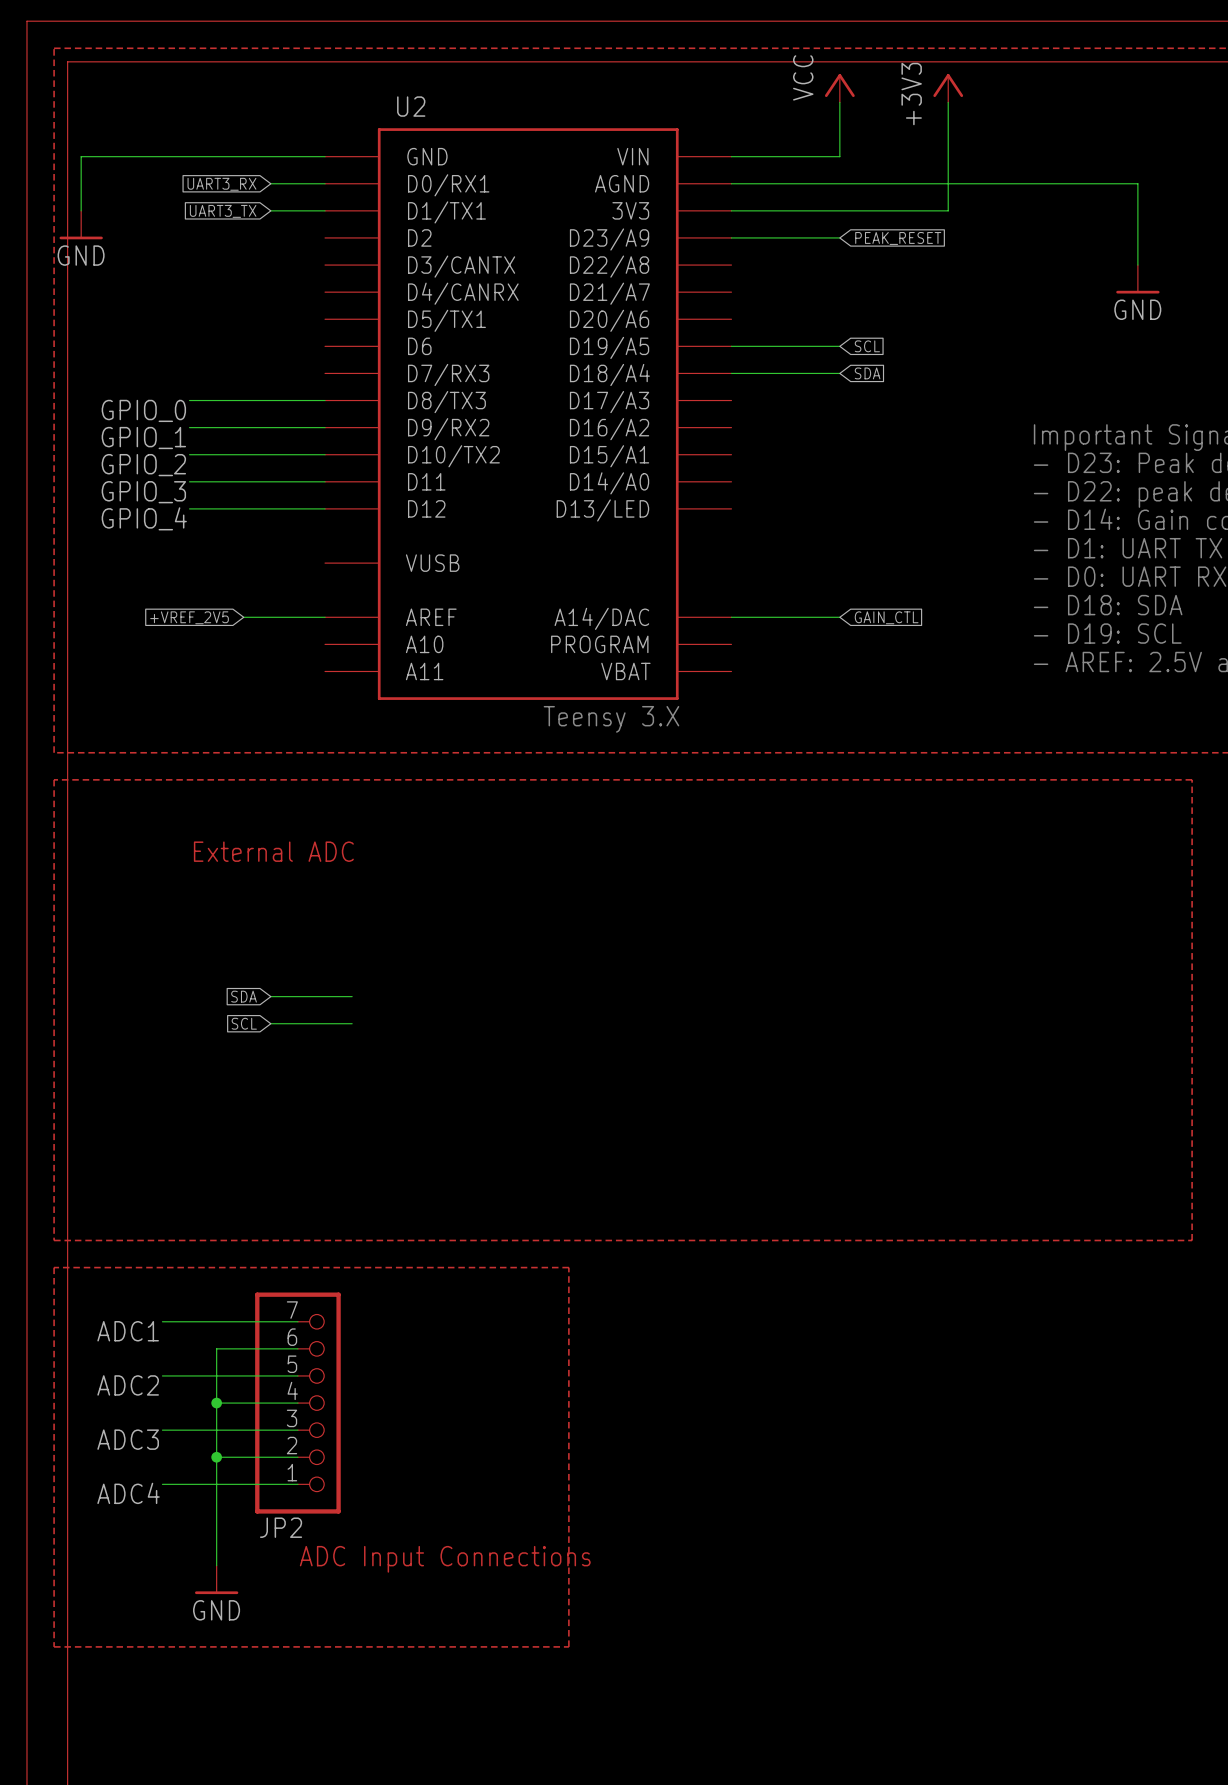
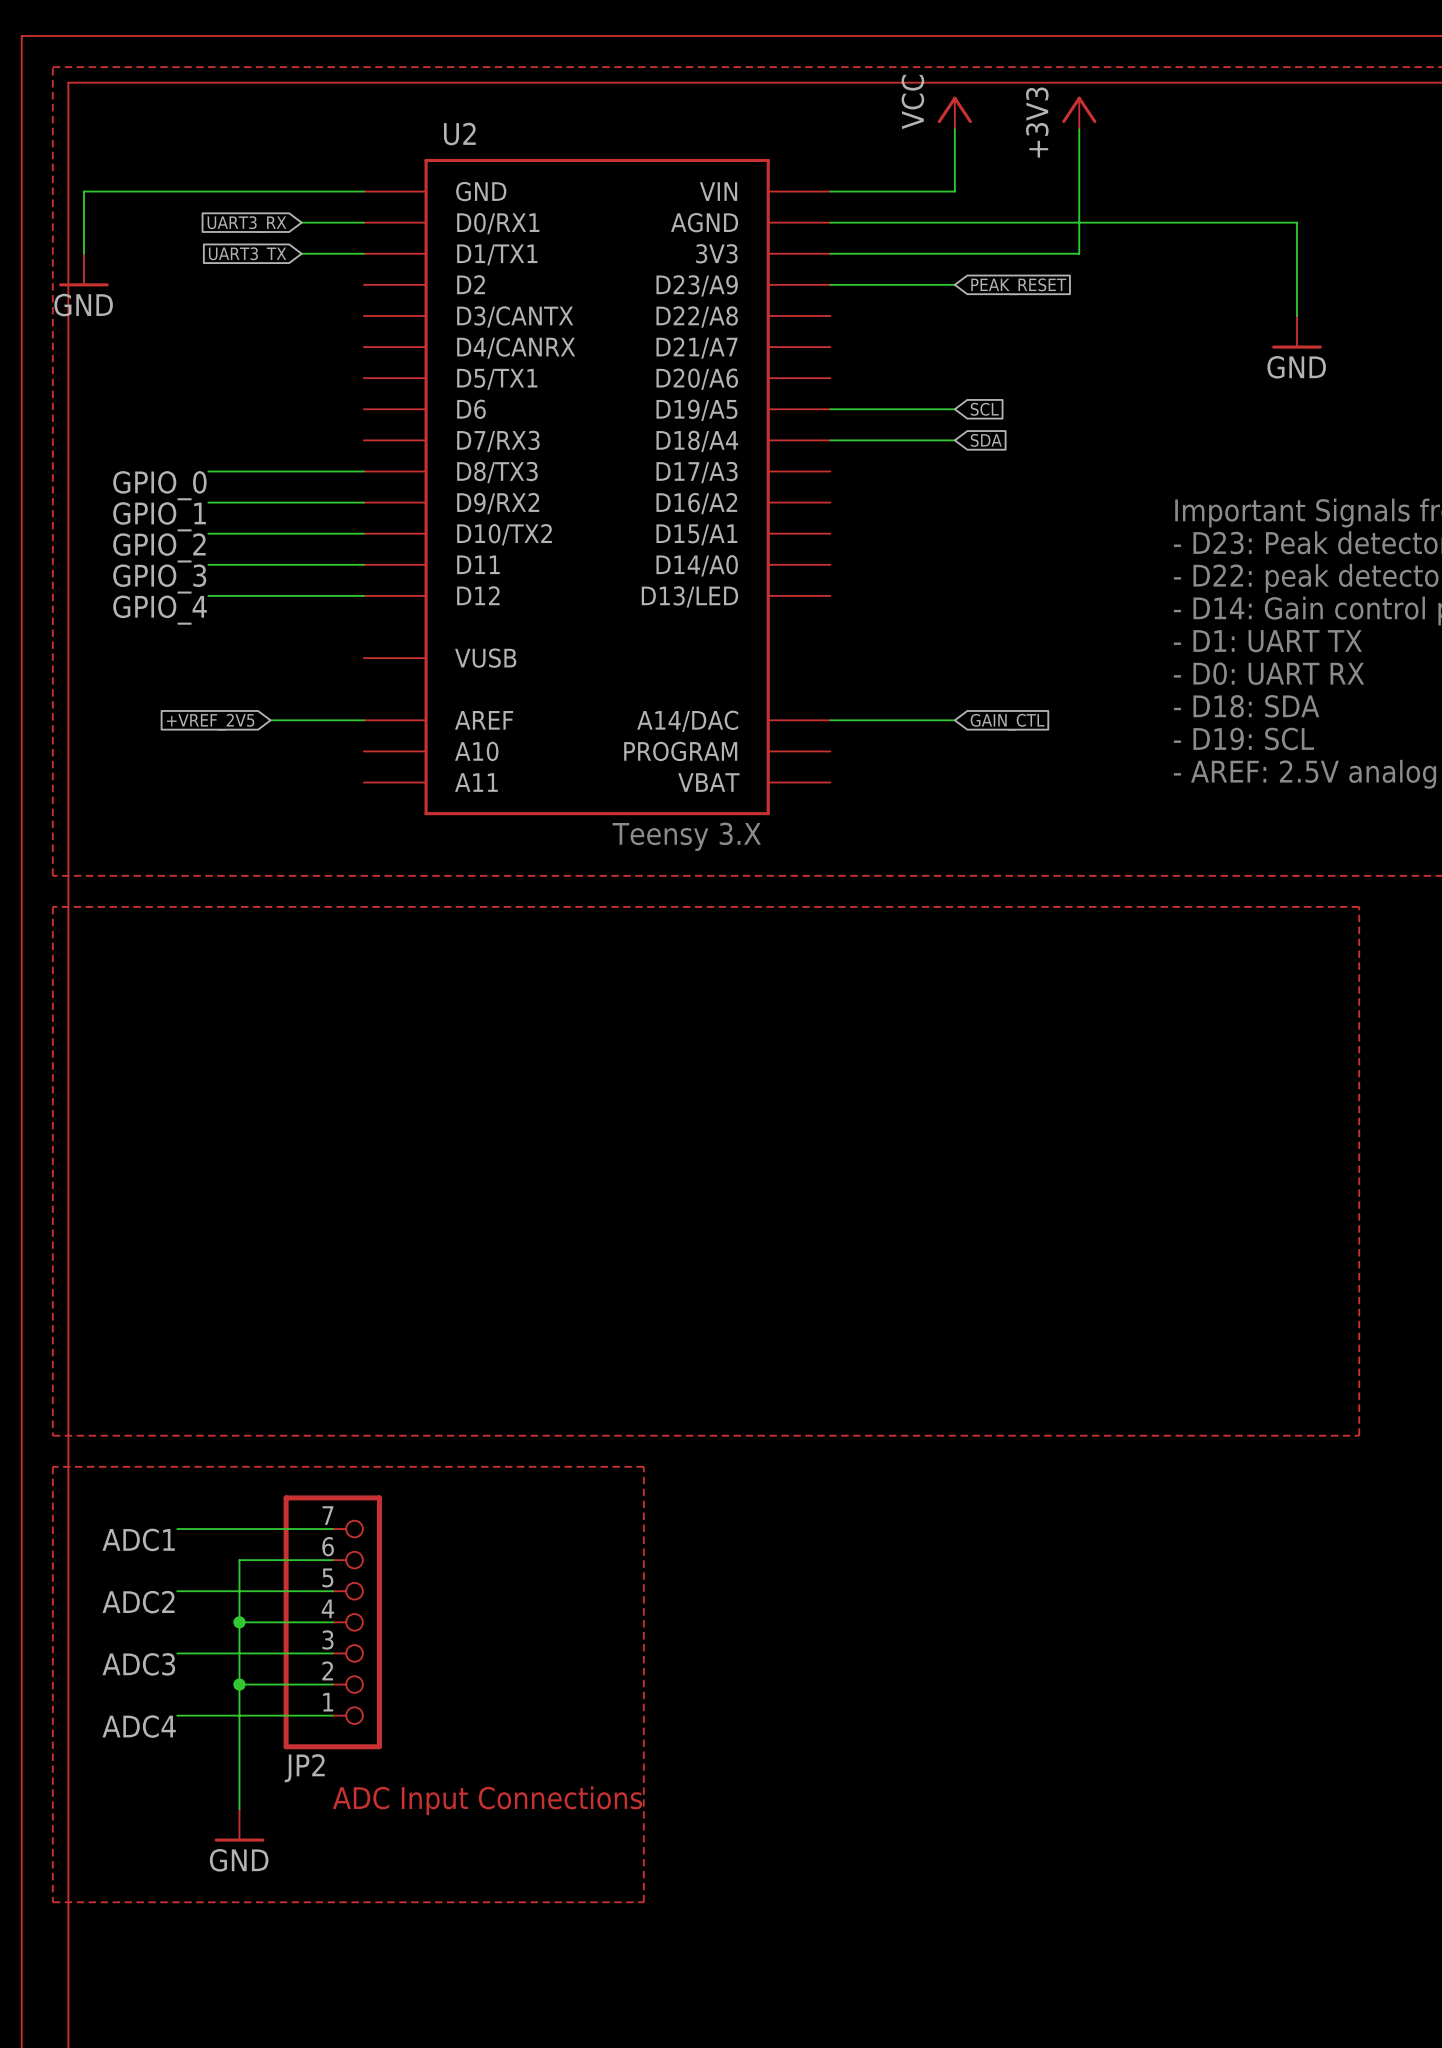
text: External ADC (273, 851) -> none
global label: SDA (244, 996) -> none
wire: (270, 996) (352, 996) -> none
global label: SCL (244, 1023) -> none
wire: (270, 1023) (352, 1023) -> none

